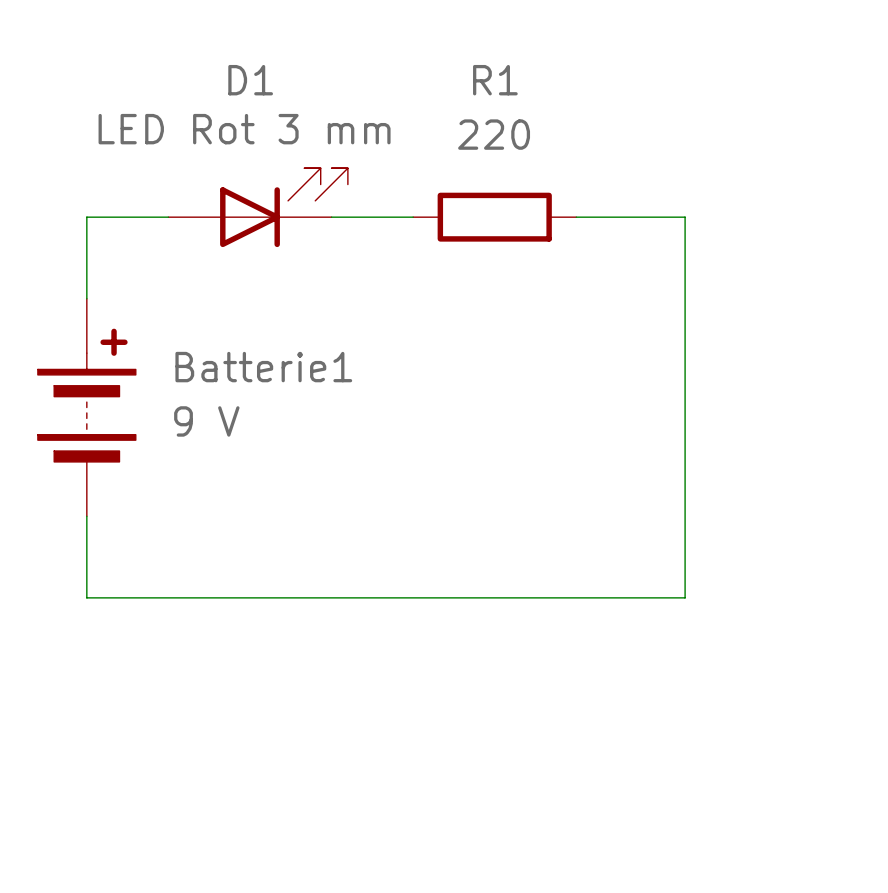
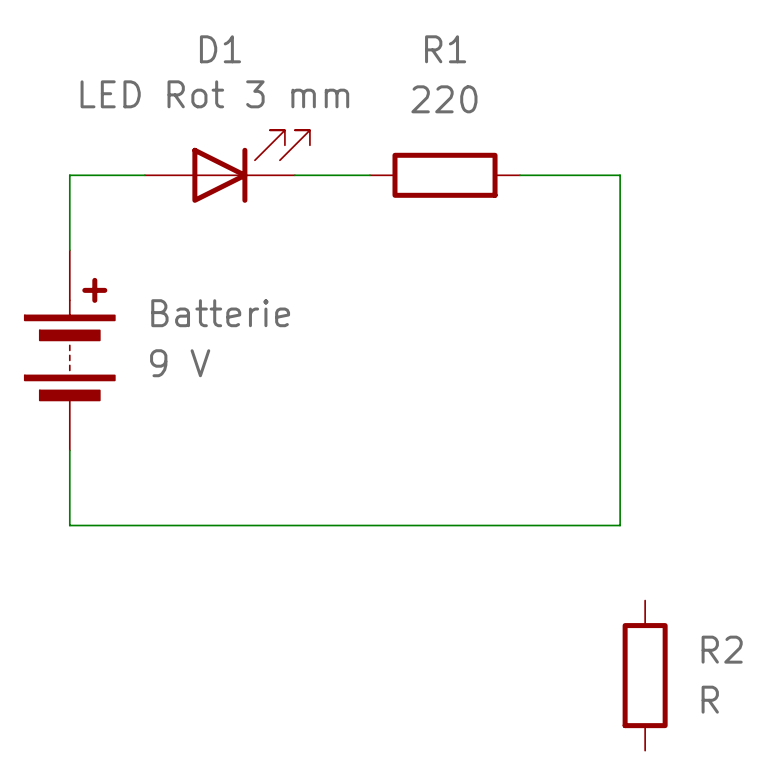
Batterie1 name: Batterie1 (263, 367) -> Batterie (220, 313)
R2: none -> R (645, 675)

